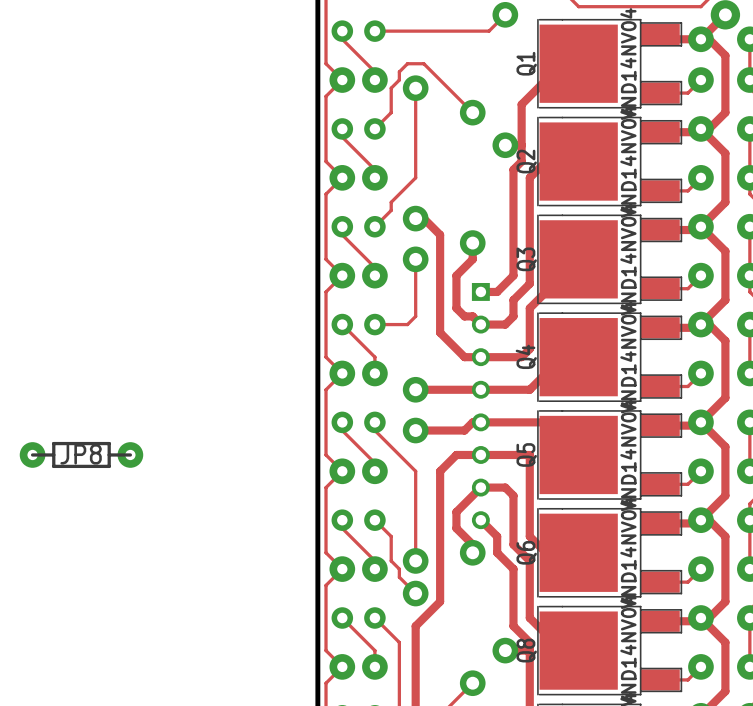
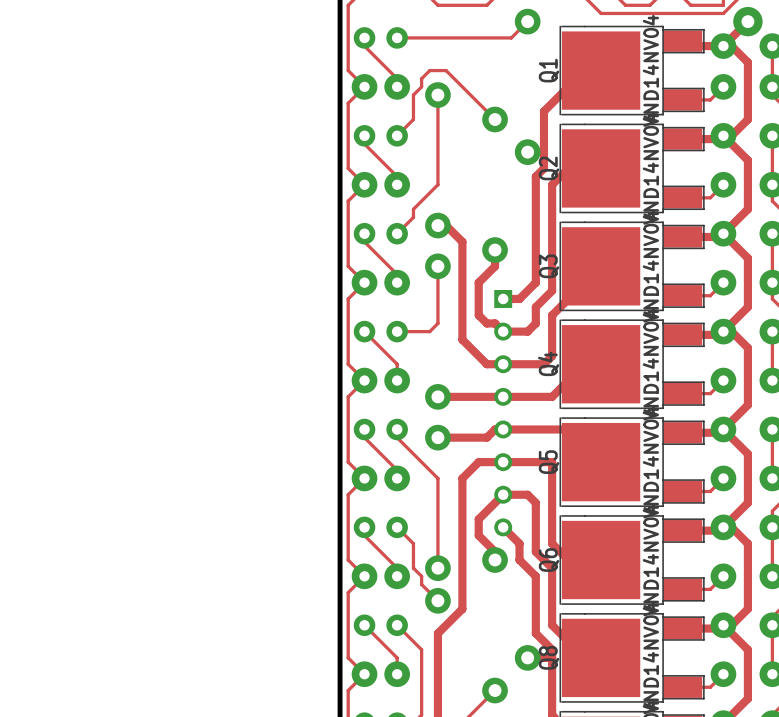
JP8: (81, 454) -> none

